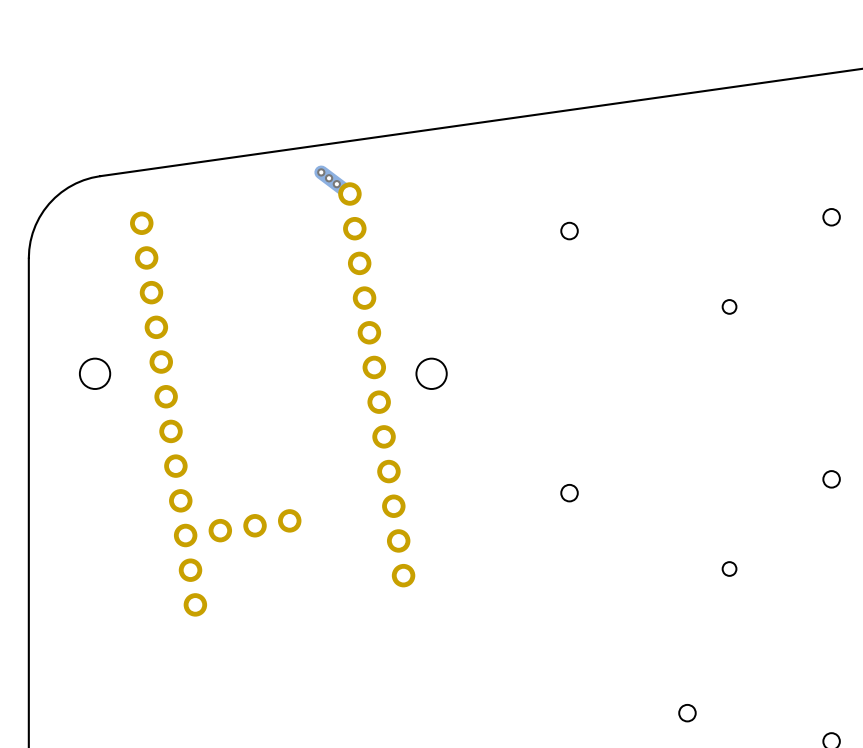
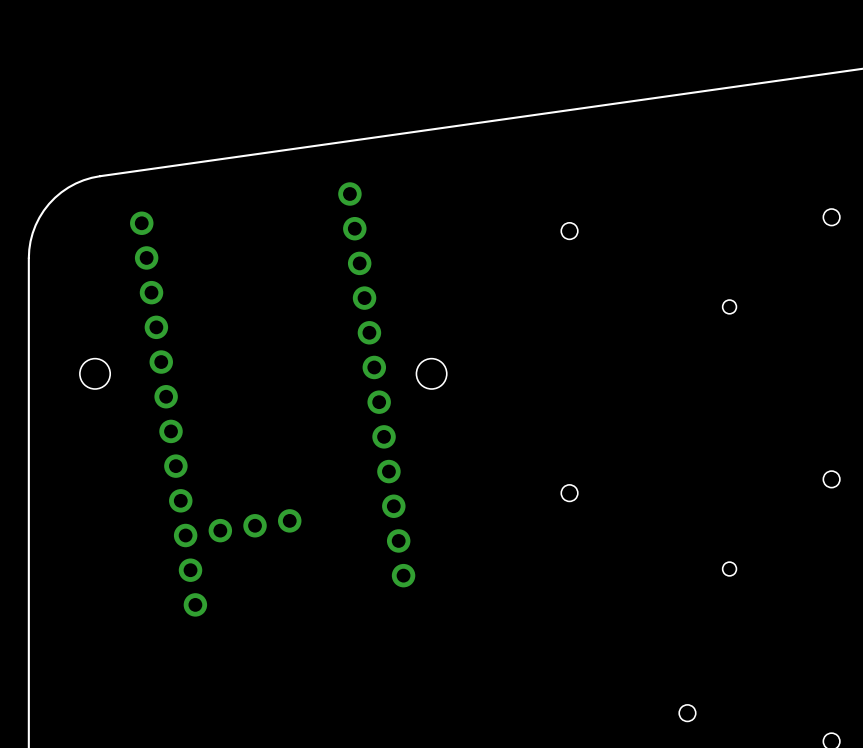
track: (321, 172) (349, 194) -> none
via: (321, 172) -> none
via: (329, 178) -> none
via: (336, 184) -> none

